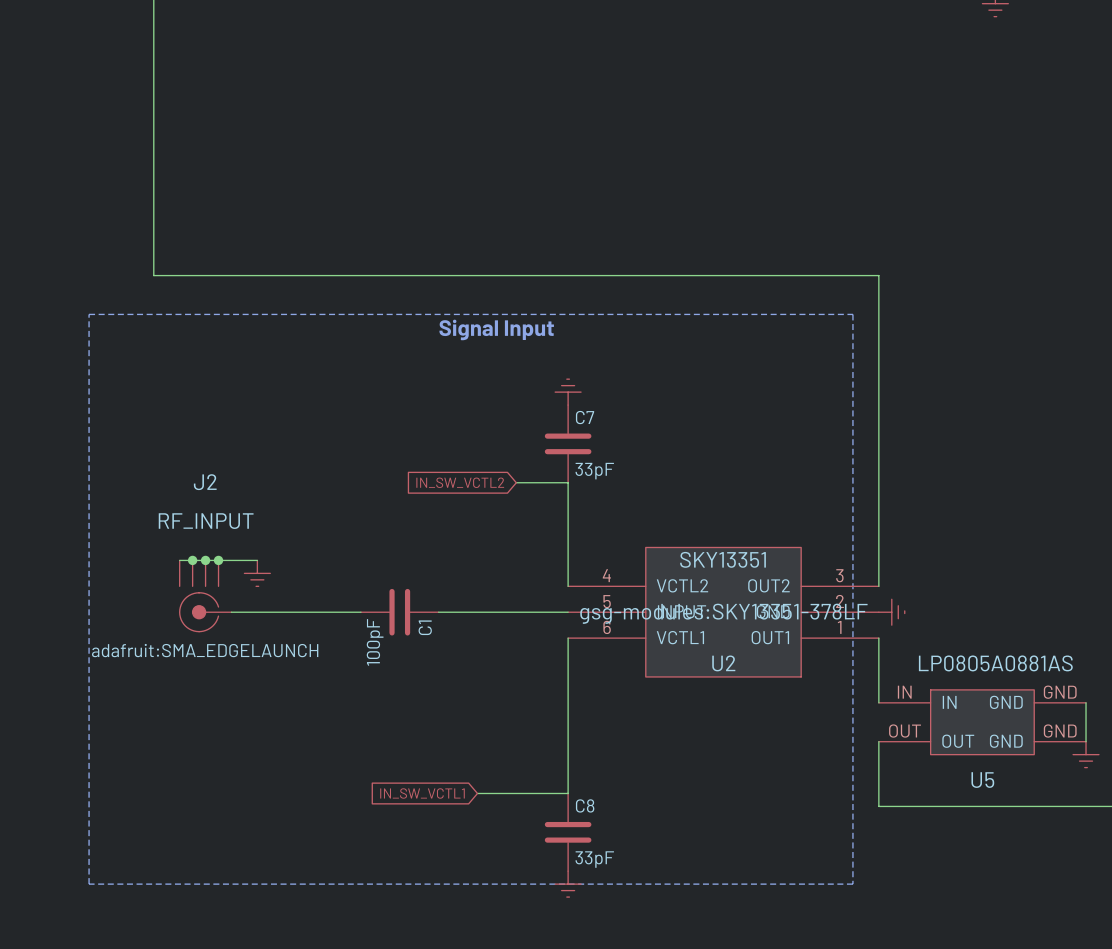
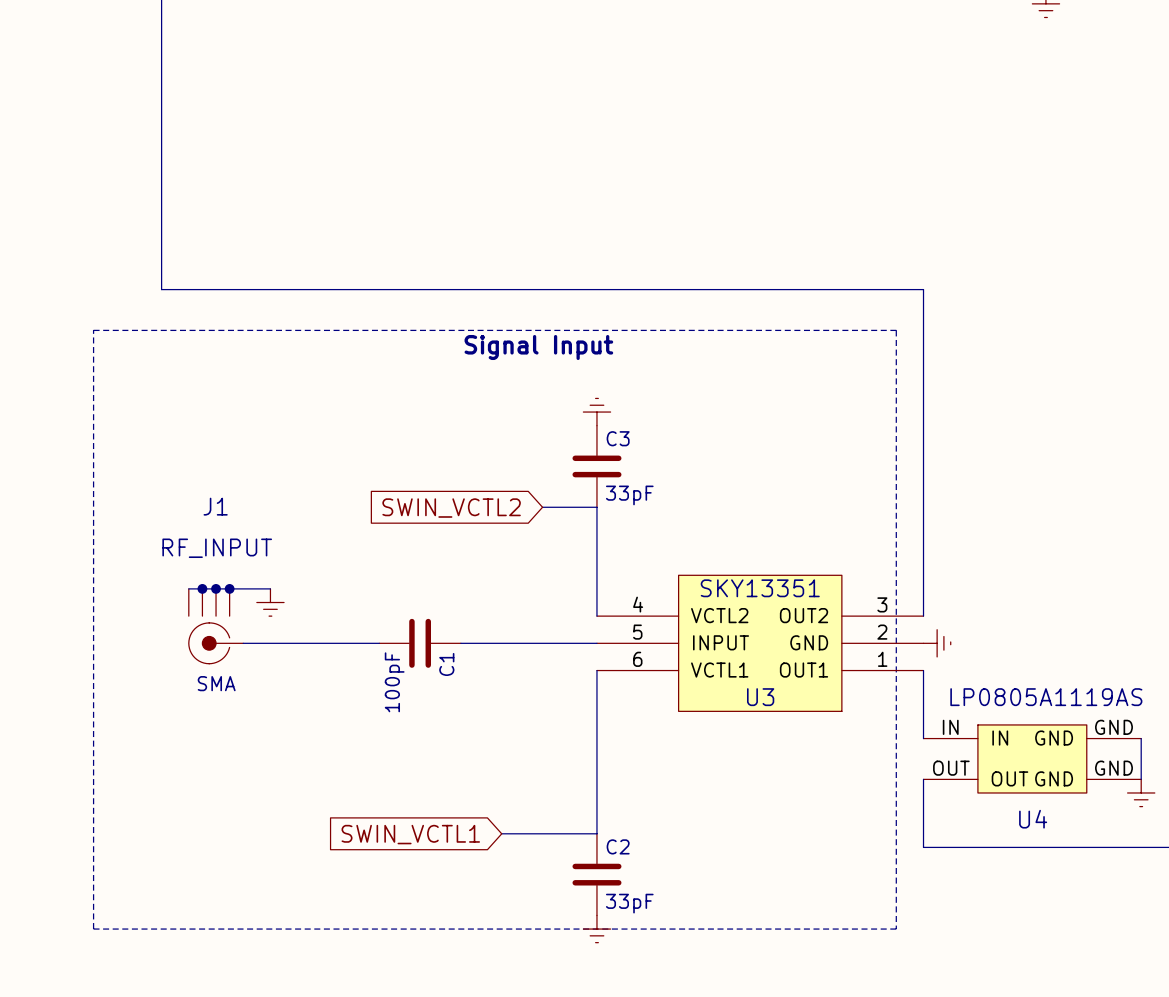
C7 name: C7 (585, 417) -> C3 (618, 438)
J2 name: J2 (205, 482) -> J1 (215, 506)
global label: IN_SW_VCTL2 (460, 482) -> SWIN_VCTL2 (451, 508)
U2 text: gsg-modules:SKY13351-378LF (723, 613) -> none
J2 text: adafruit:SMA_EDGELAUNCH (205, 650) -> SMA (216, 683)
U2 name: U2 (723, 663) -> U3 (760, 697)
U5 value: LP0805A0881AS (995, 663) -> LP0805A1119AS (1046, 697)
U5 name: U5 (982, 780) -> U4 (1033, 819)
global label: IN_SW_VCTL1 (422, 793) -> SWIN_VCTL1 (410, 834)
C8 name: C8 (585, 805) -> C2 (618, 846)

